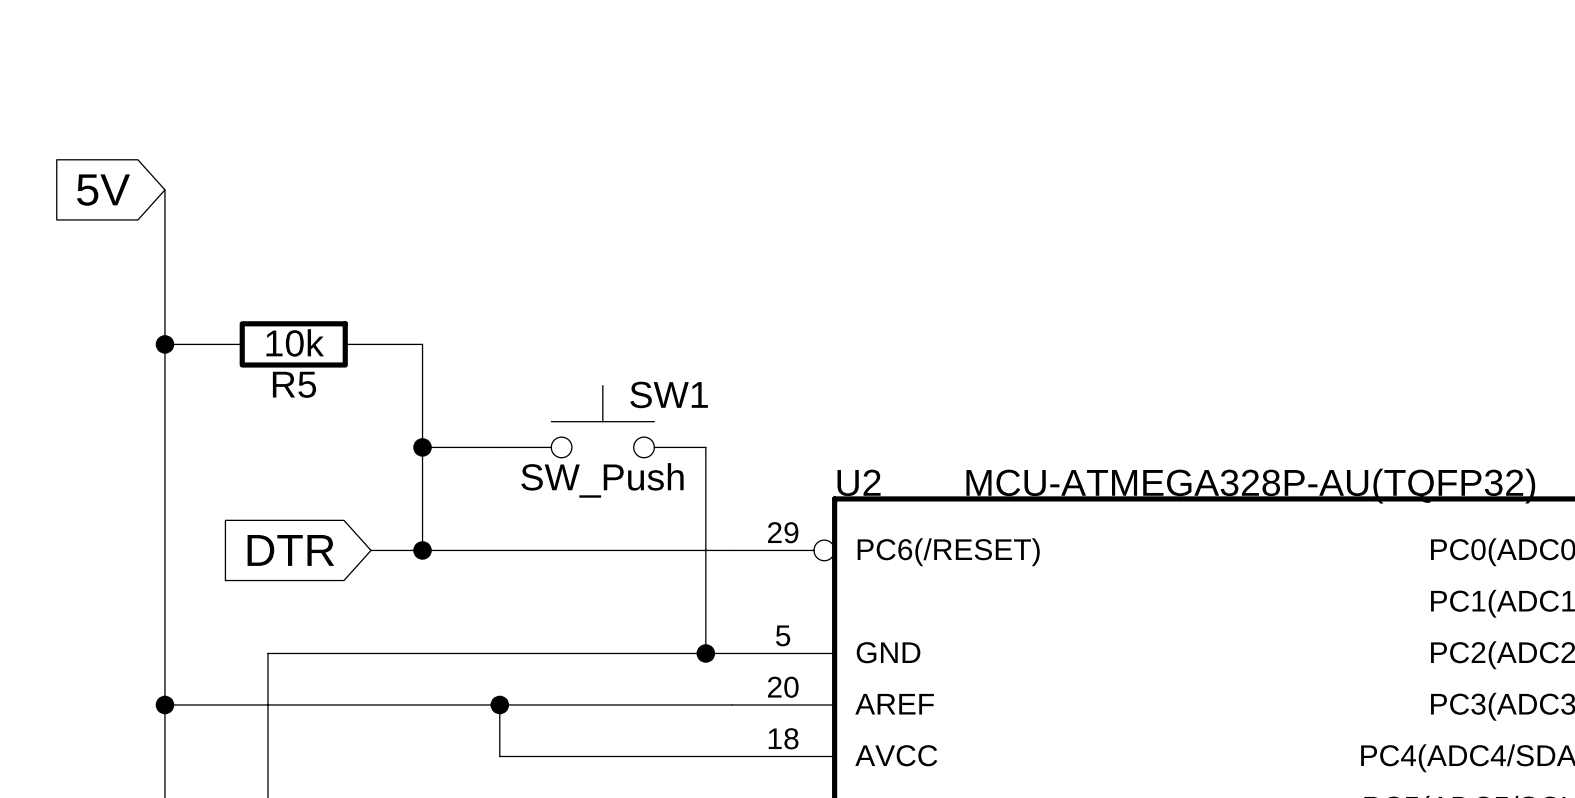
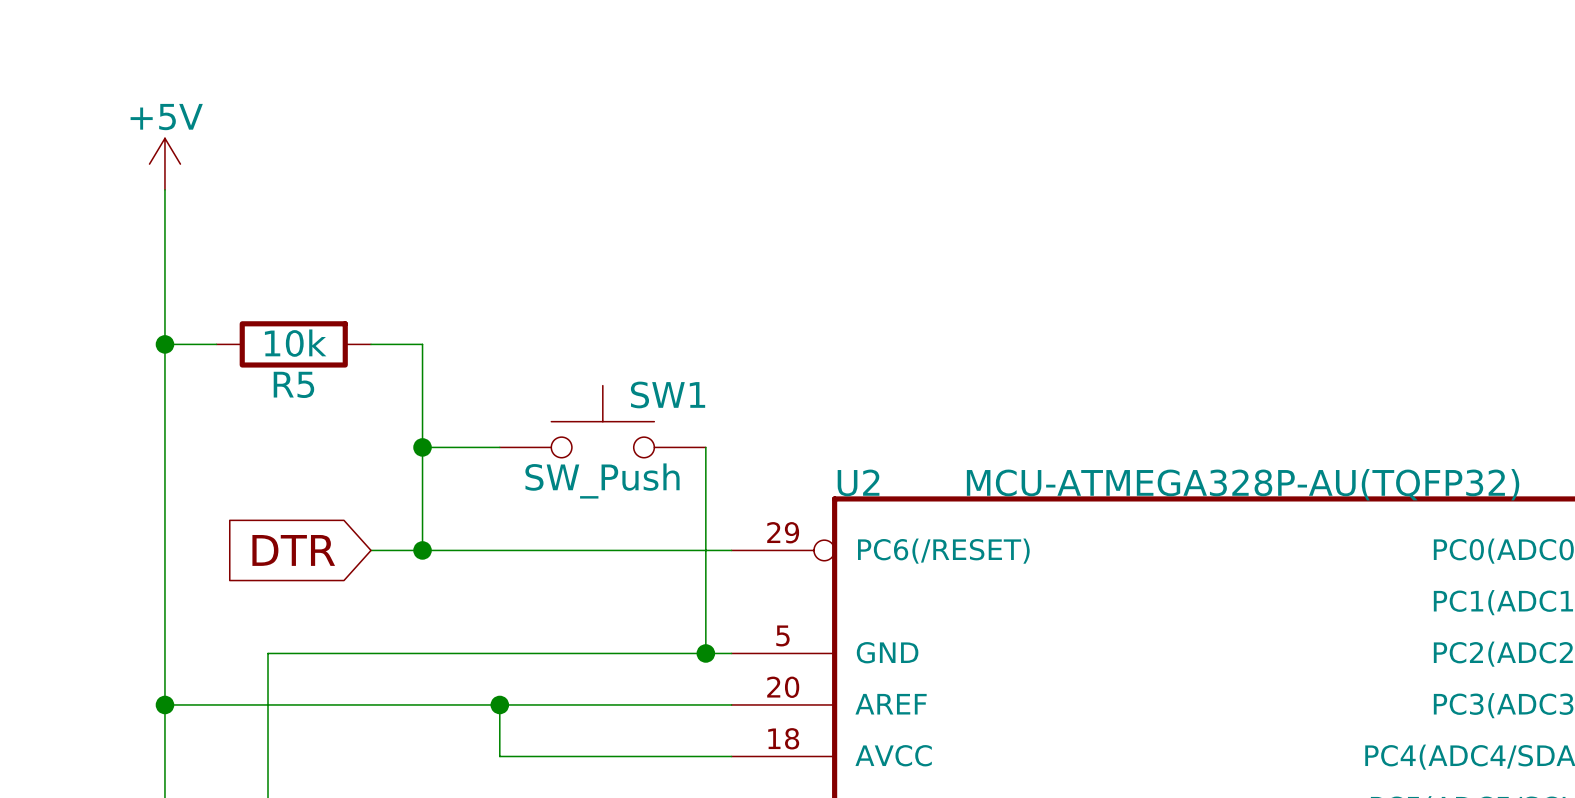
power symbol: none -> +5V (164, 164)
global label: 5V (103, 190) -> none

